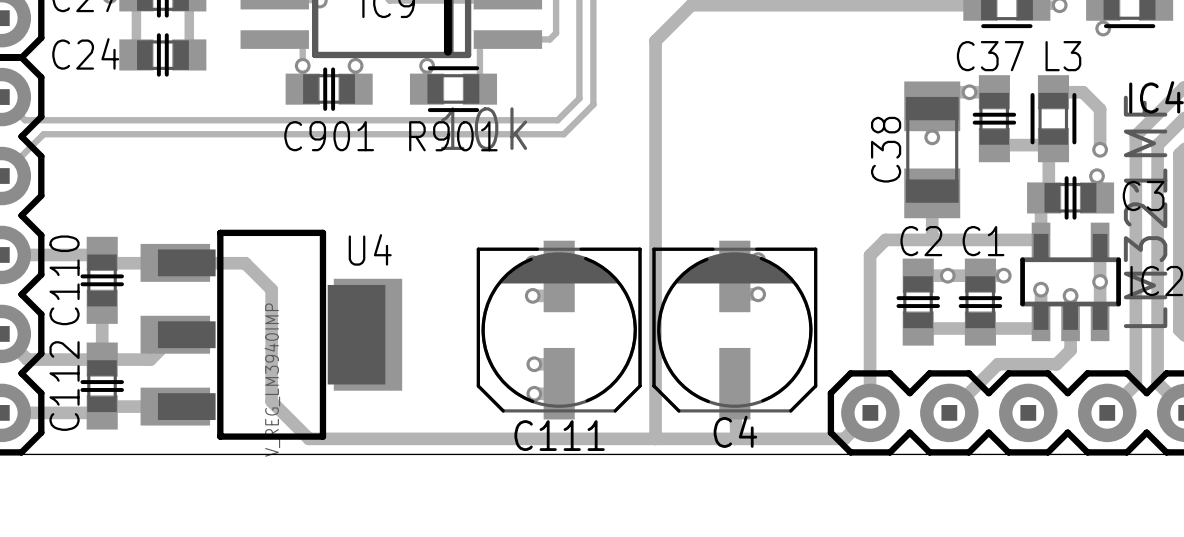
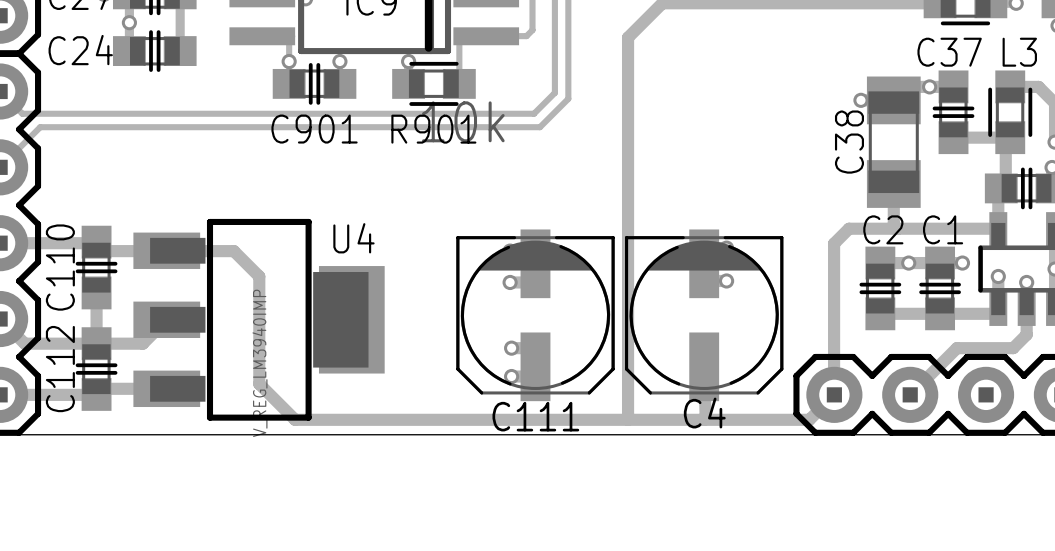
via: none -> (129, 22)
via position: (932, 137) -> (860, 100)

